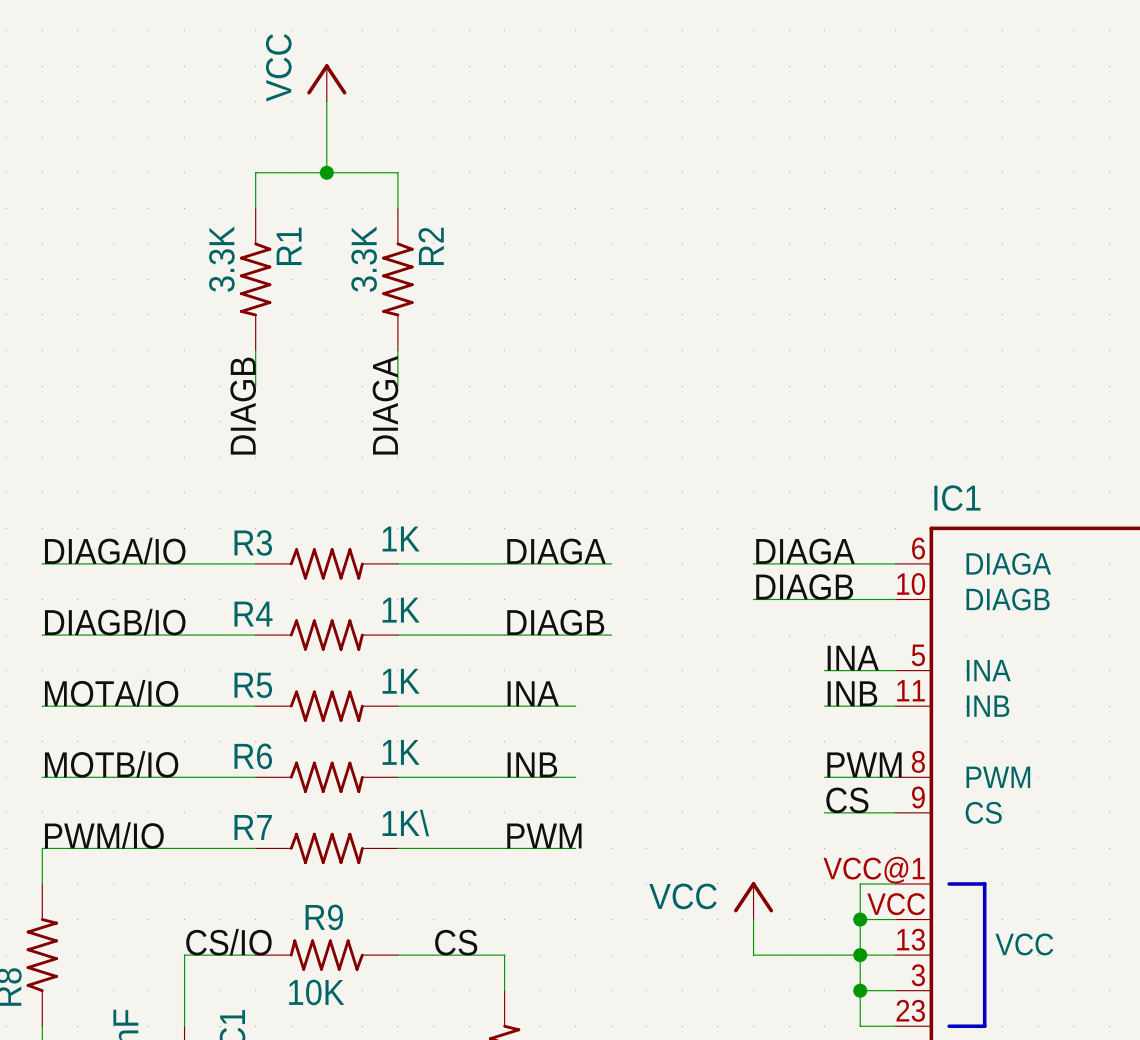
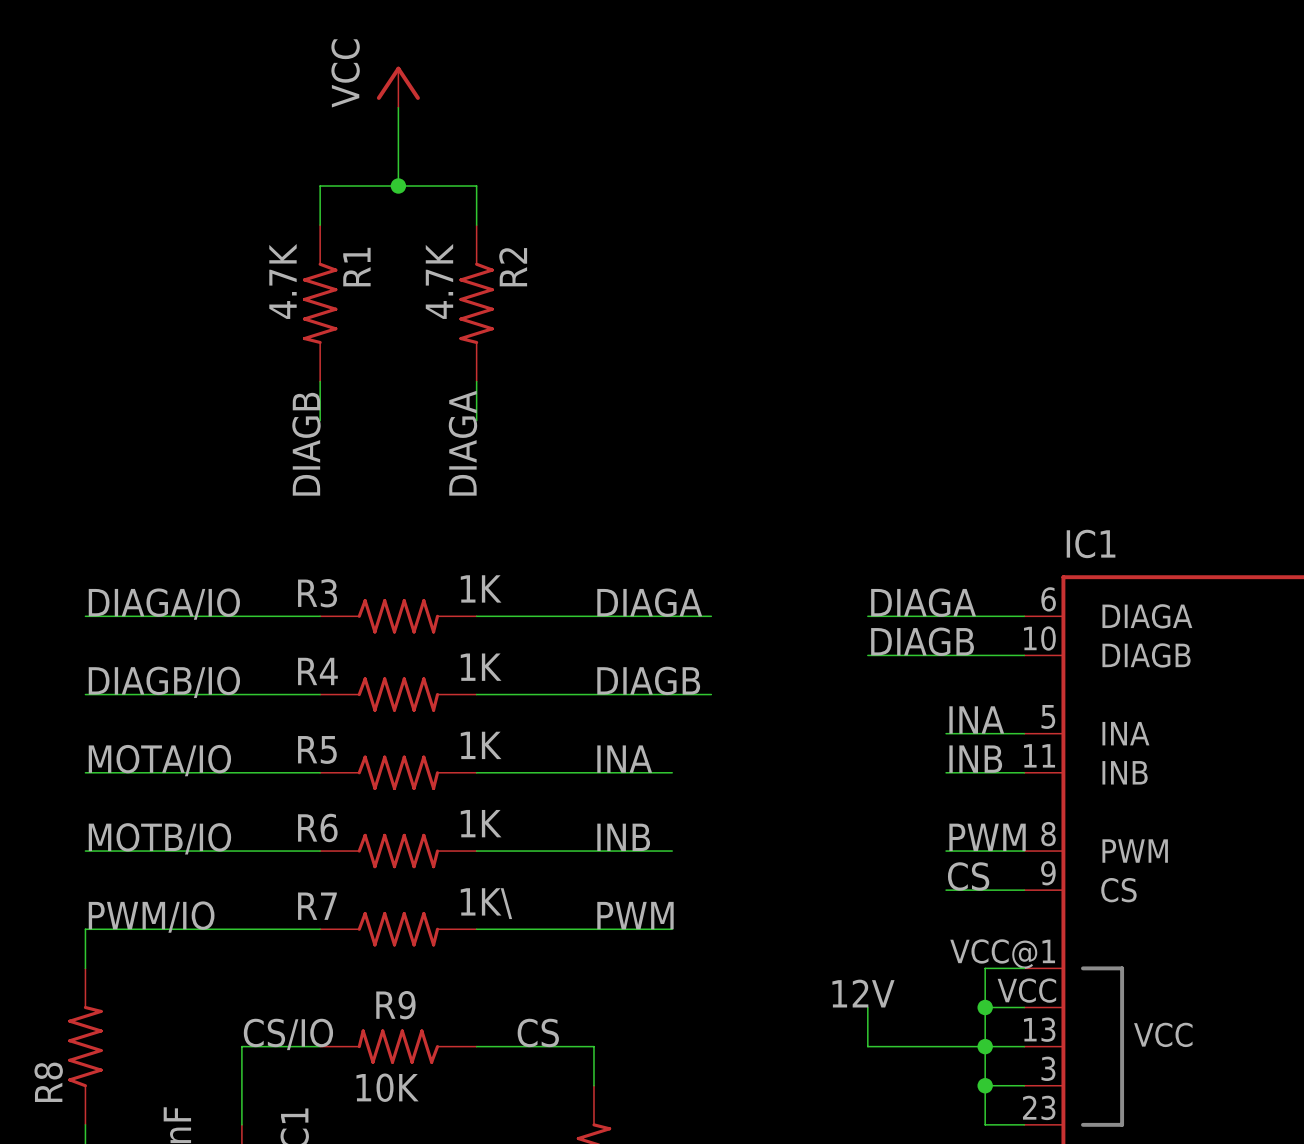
R1 value: 3.3K (221, 259) -> 4.7K (282, 281)
R2 value: 3.3K (364, 259) -> 4.7K (439, 281)
power symbol: VCC (753, 900) -> none
label: none -> 12V (863, 993)

